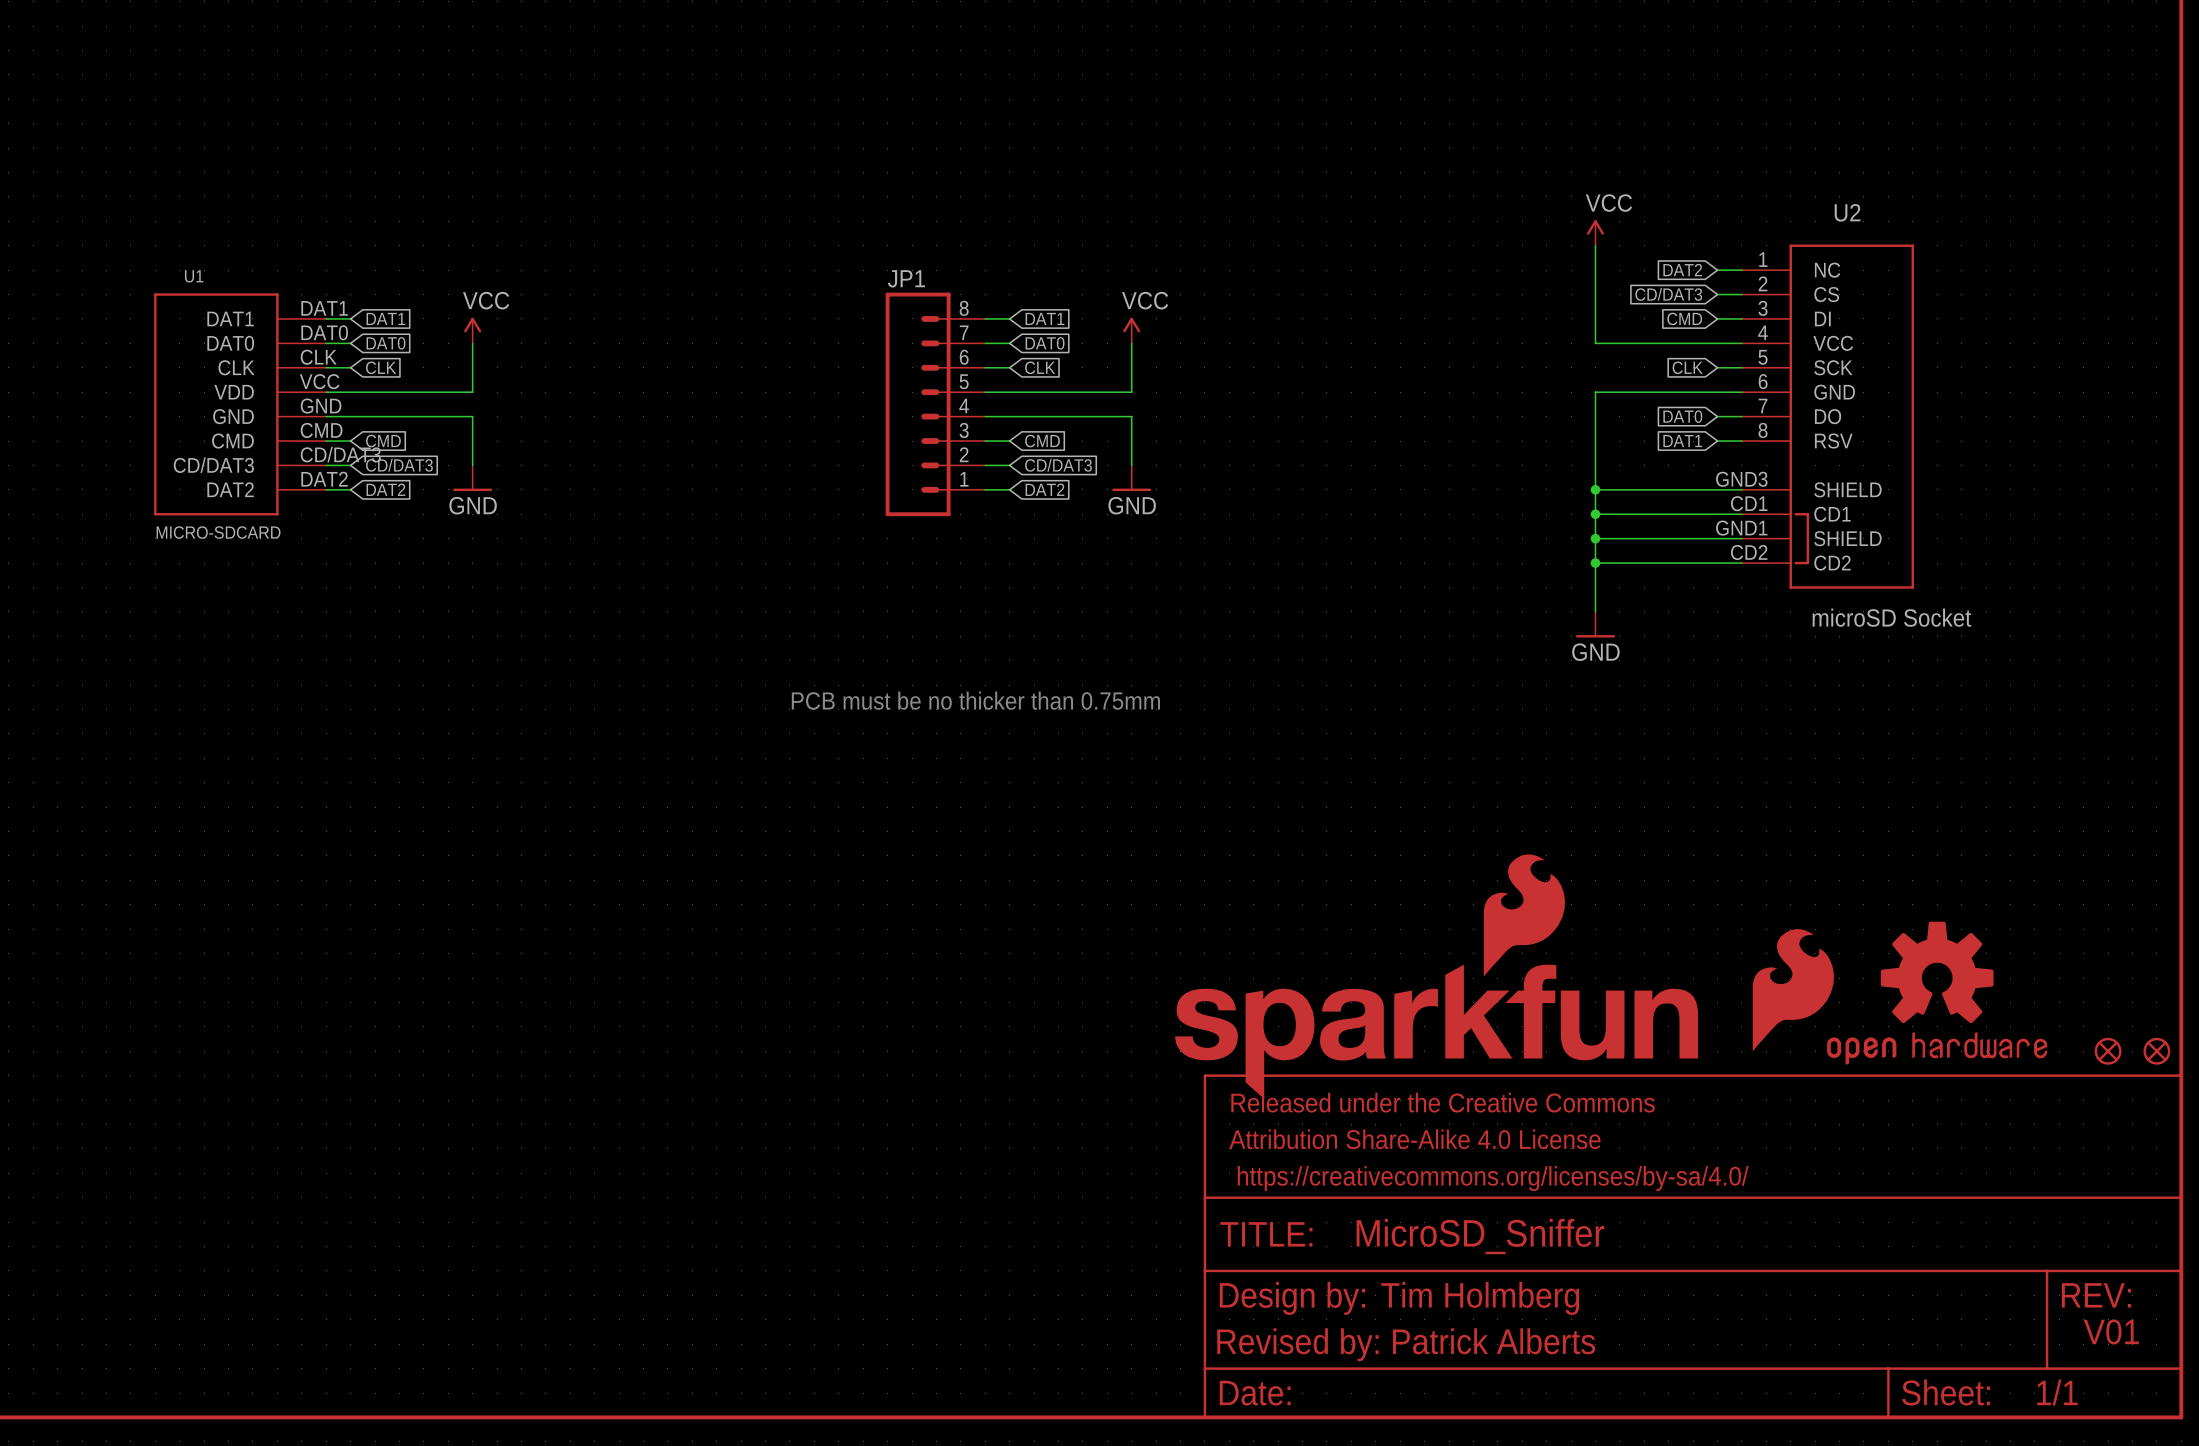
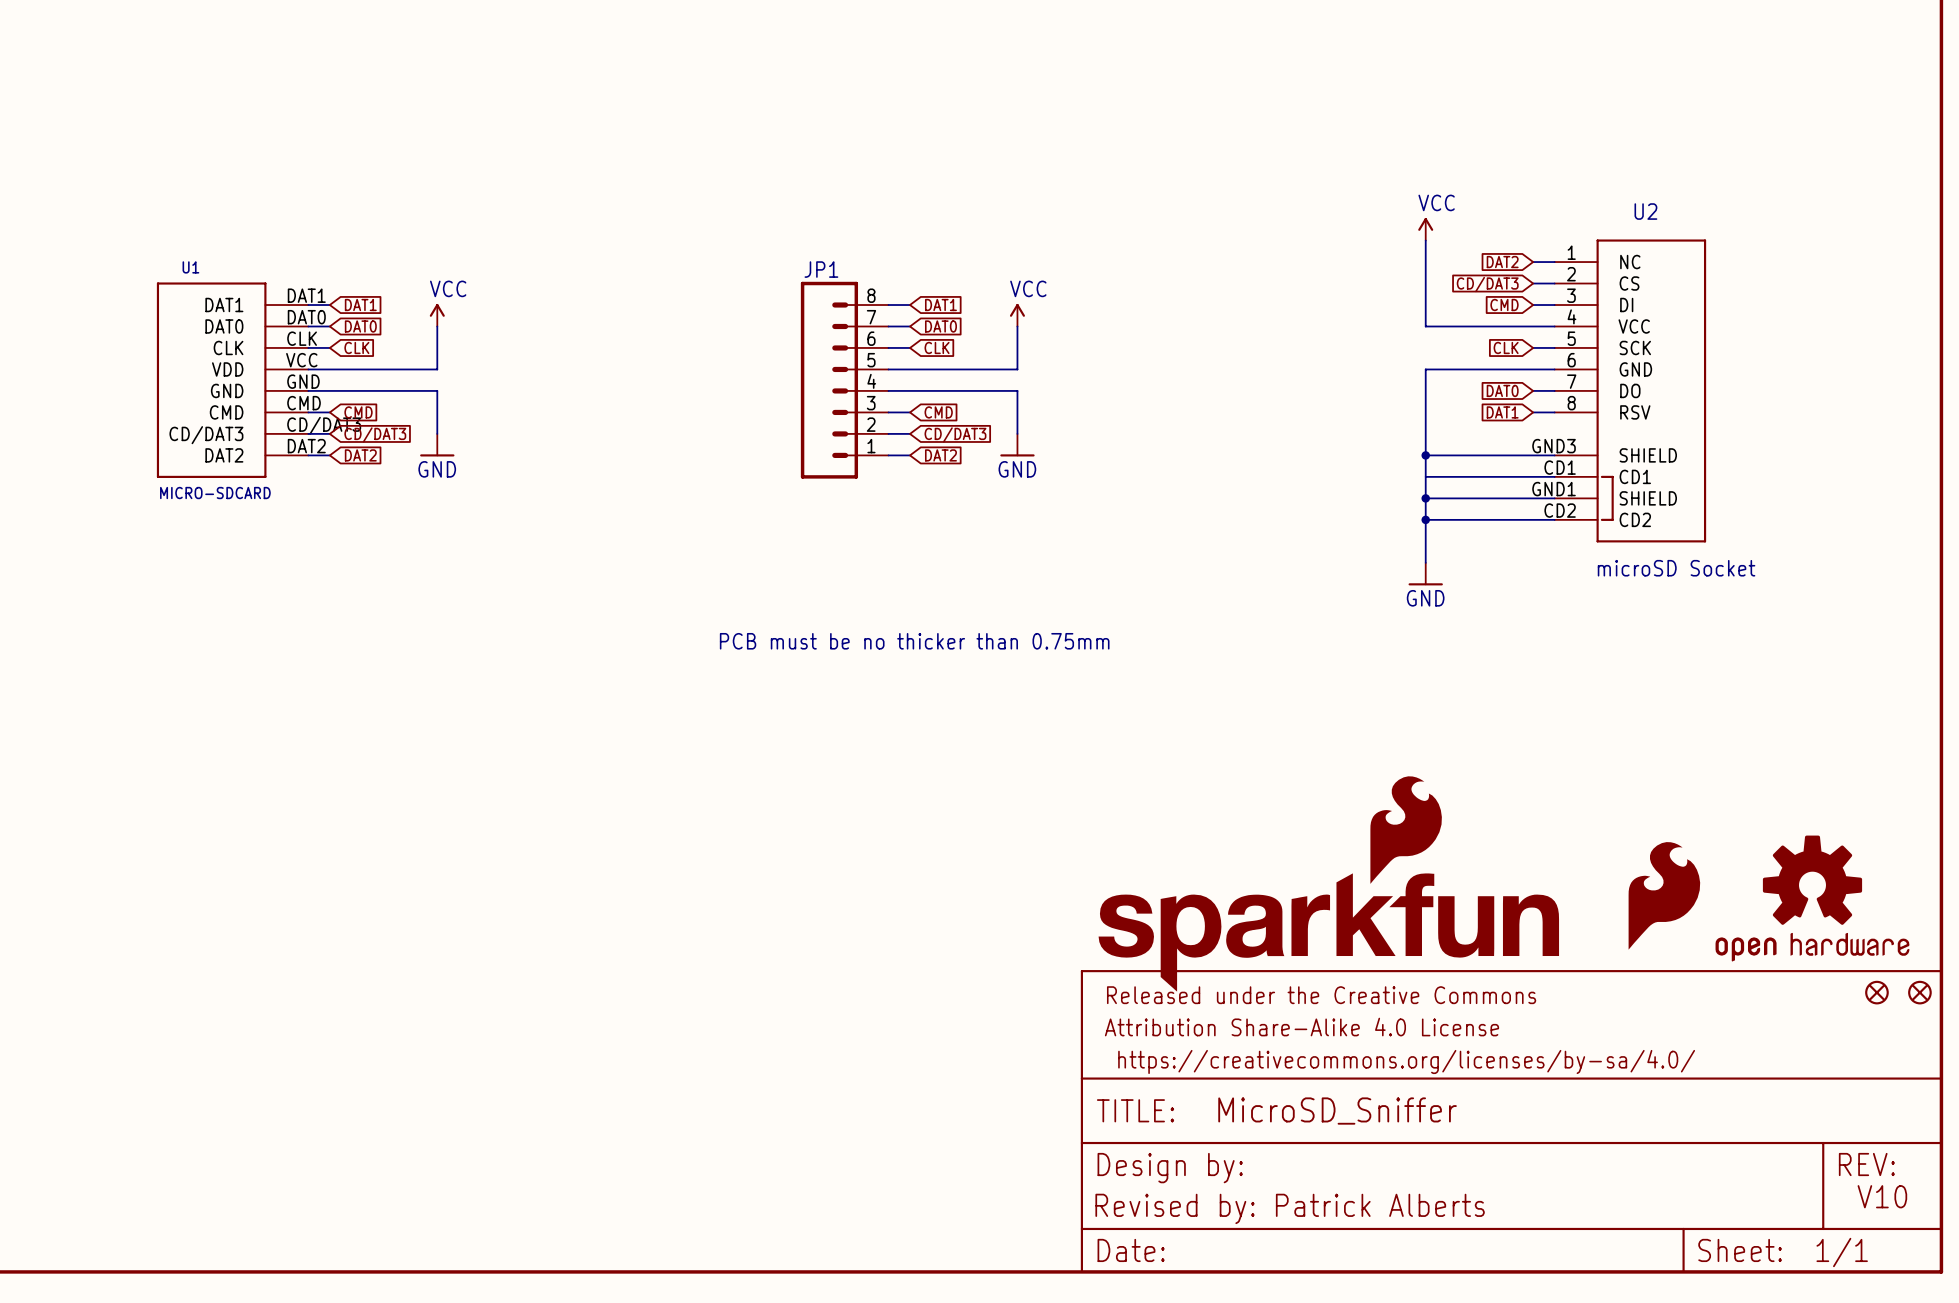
junction: (1595, 514) -> none
part position: (1436, 976) -> (1328, 883)
part position: (1793, 990) -> (1664, 895)
part position: (1937, 993) -> (1812, 898)
part: (2108, 1051) -> none
part: (2156, 1051) -> none
part: none -> (1876, 992)
part: none -> (1919, 992)
text: Tim Holmberg (1480, 1298) -> none
text: V01 (2111, 1331) -> V10 (1882, 1196)

